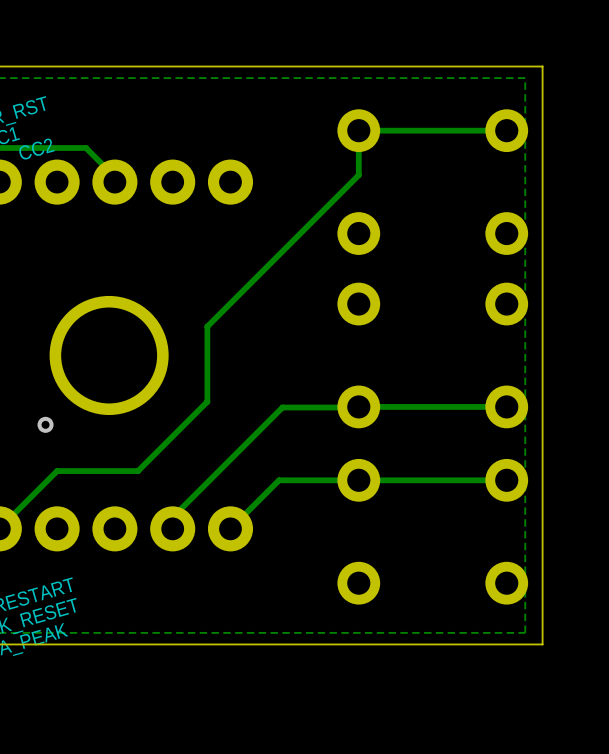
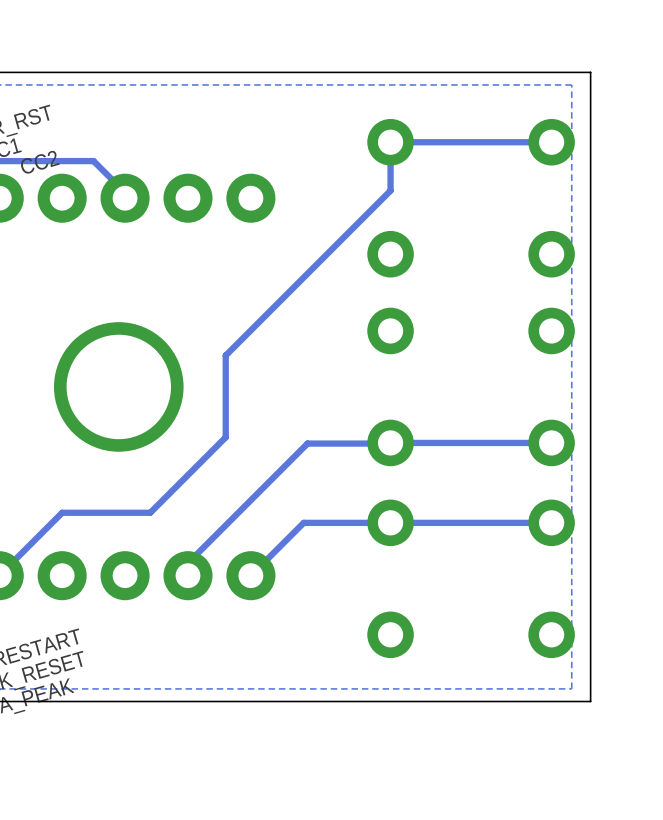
via: (45, 424) -> none

